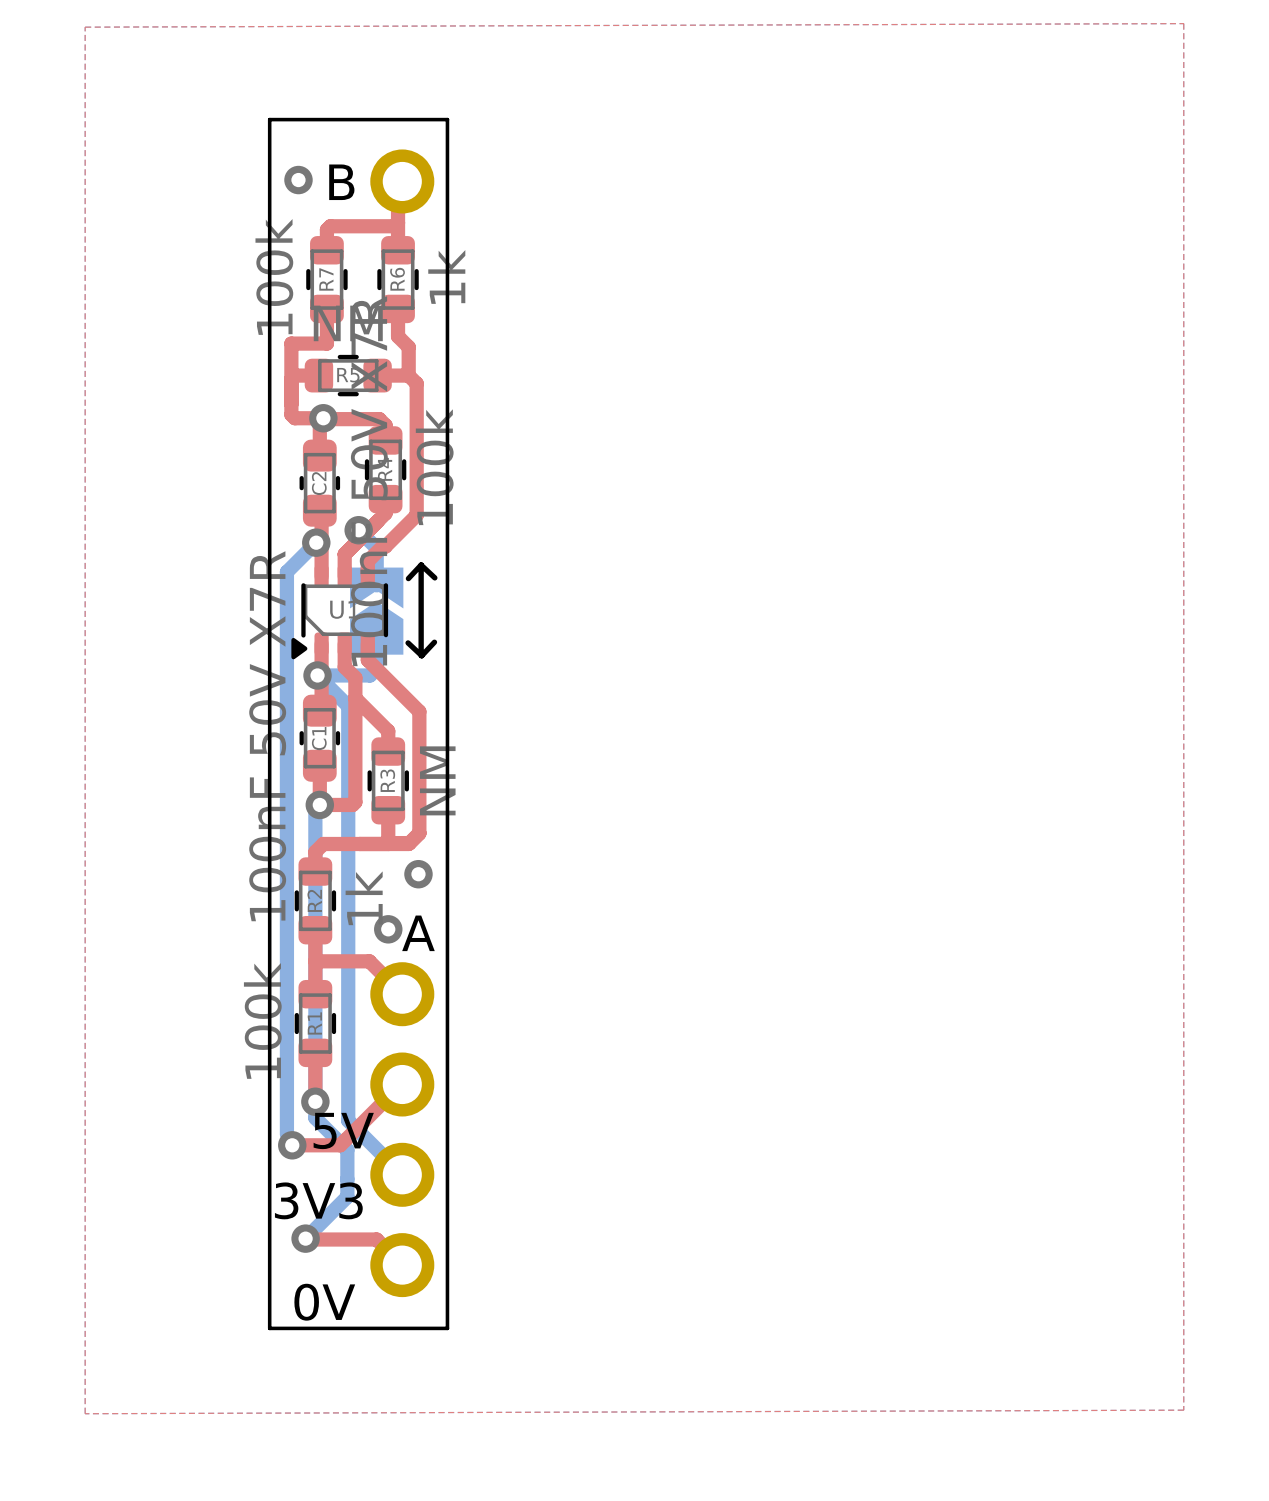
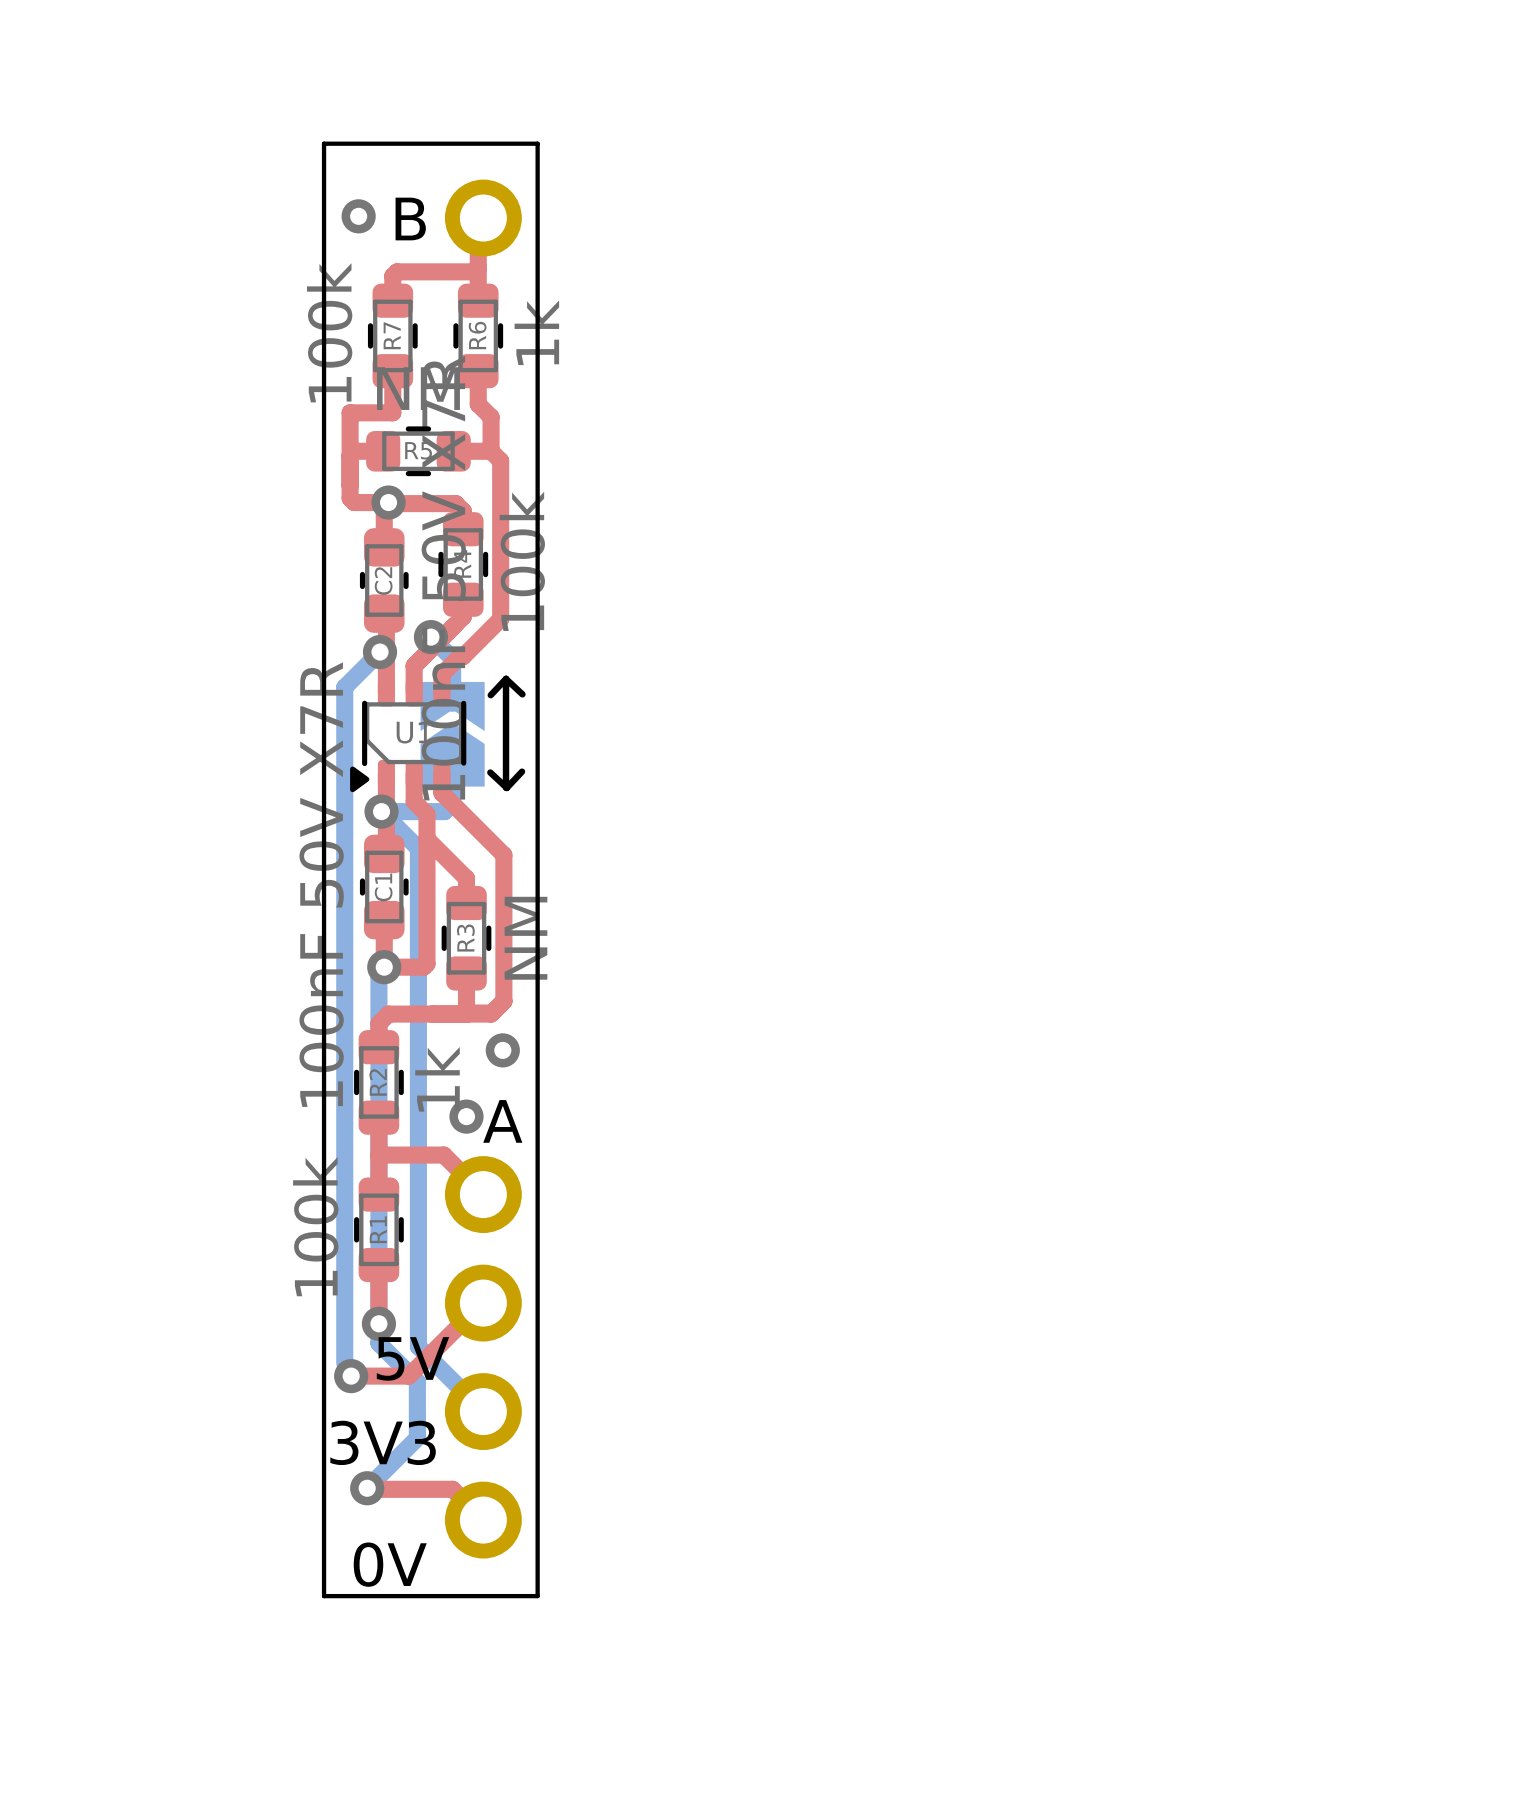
top zone outline: (1183, 23) (85, 27) (85, 1413) (1183, 1410) (1183, 23) -> none

